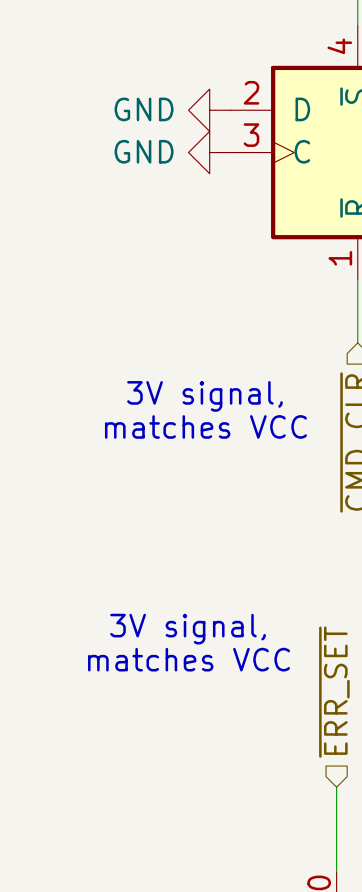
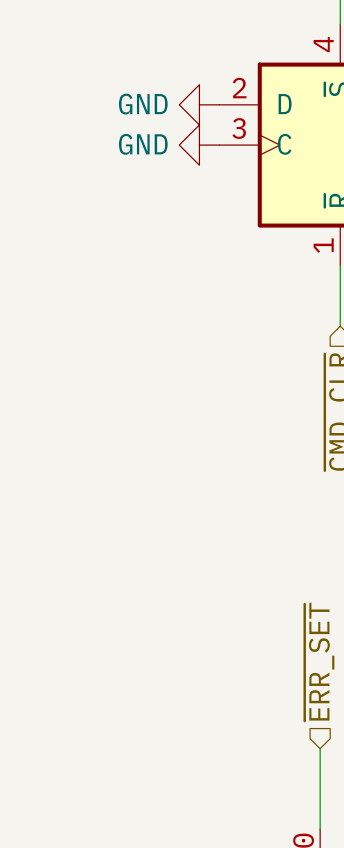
text: 3V signal, (204, 396) -> none
text: matches VCC (205, 426) -> none
text: 3V signal, (188, 629) -> none
text: matches VCC (189, 659) -> none

